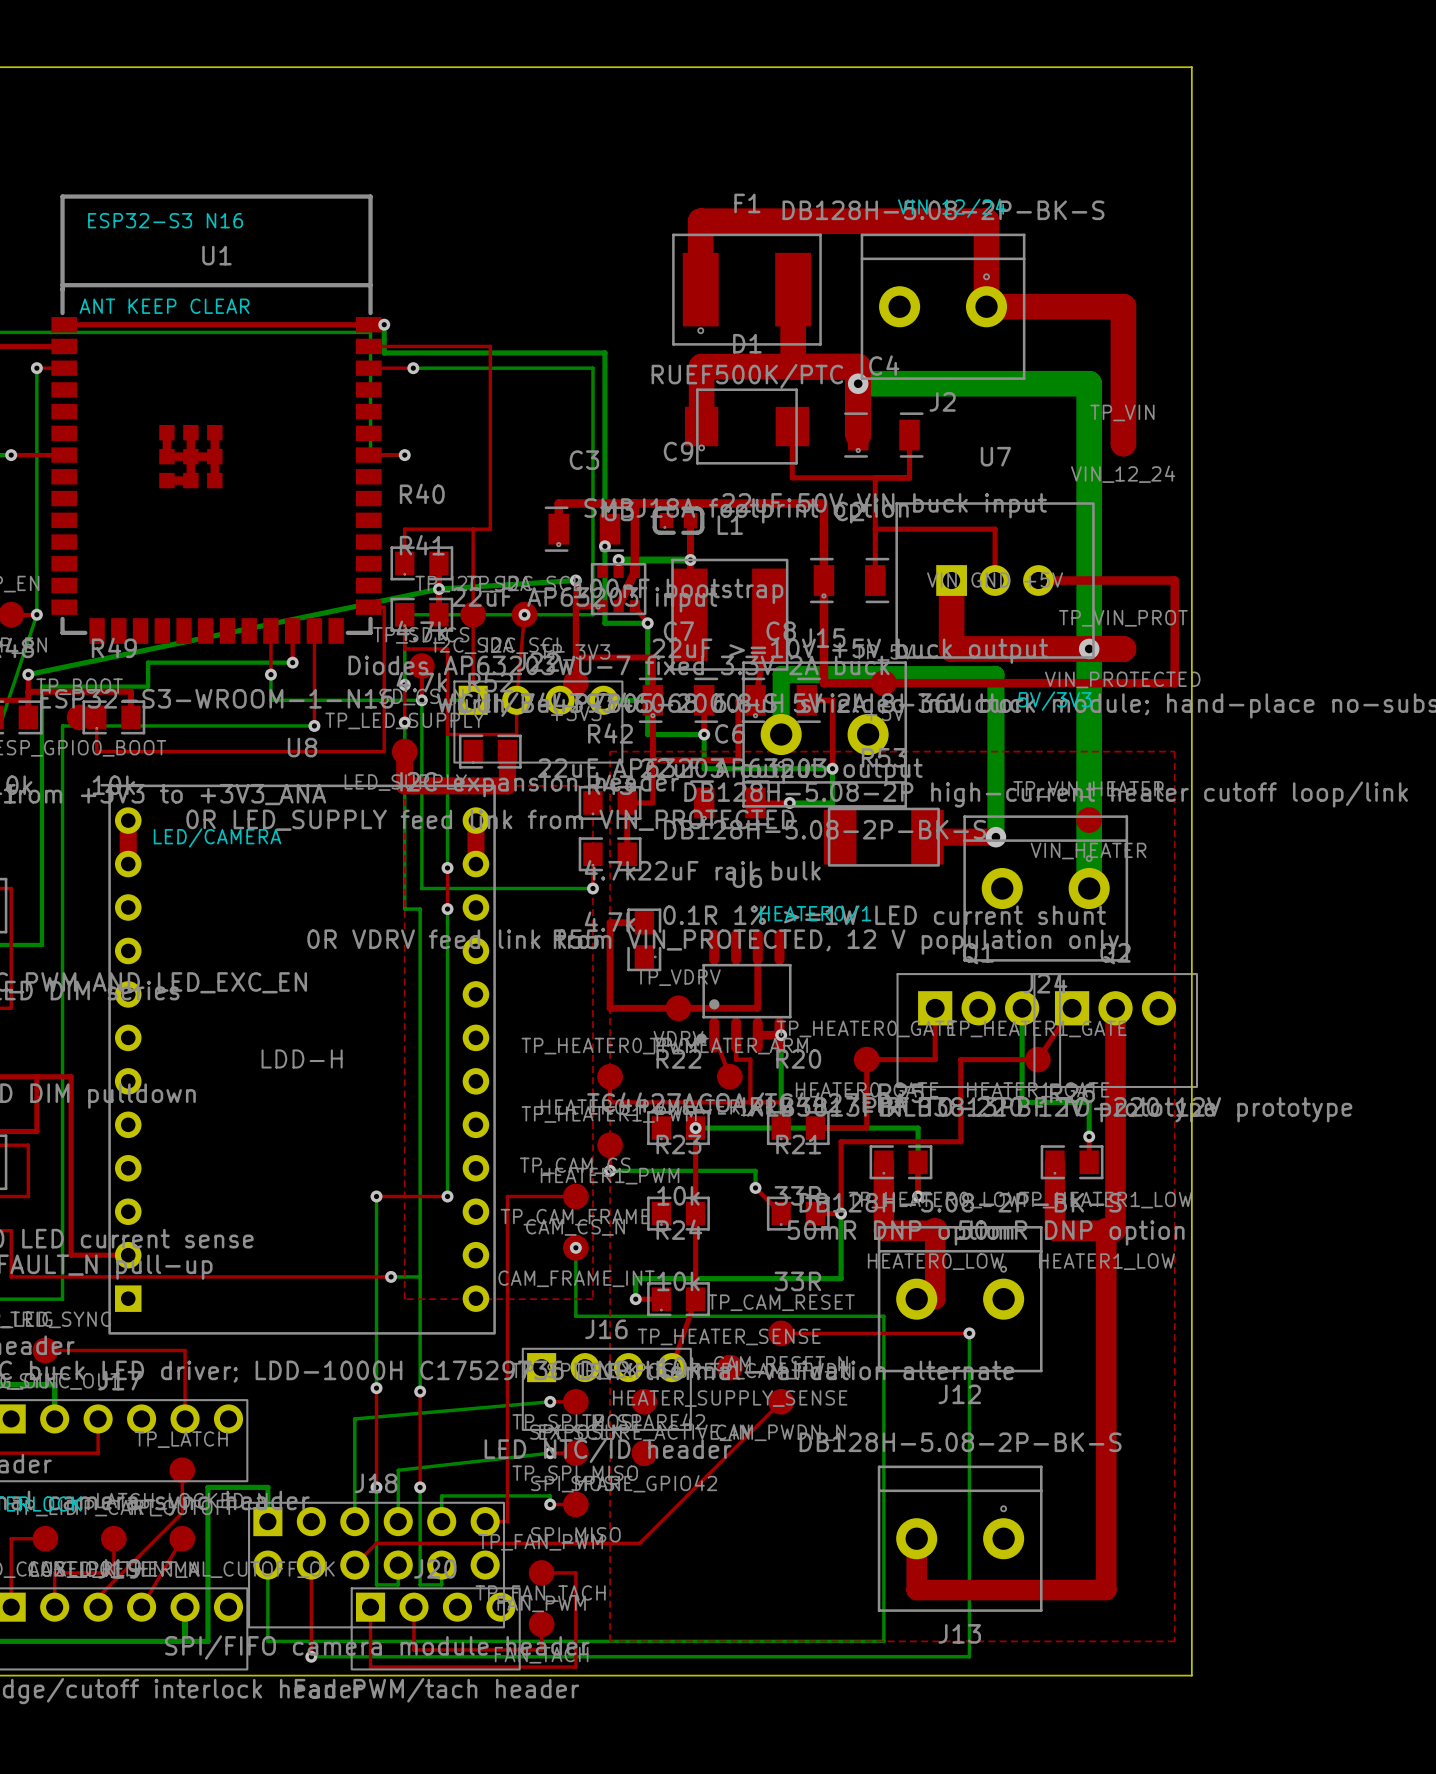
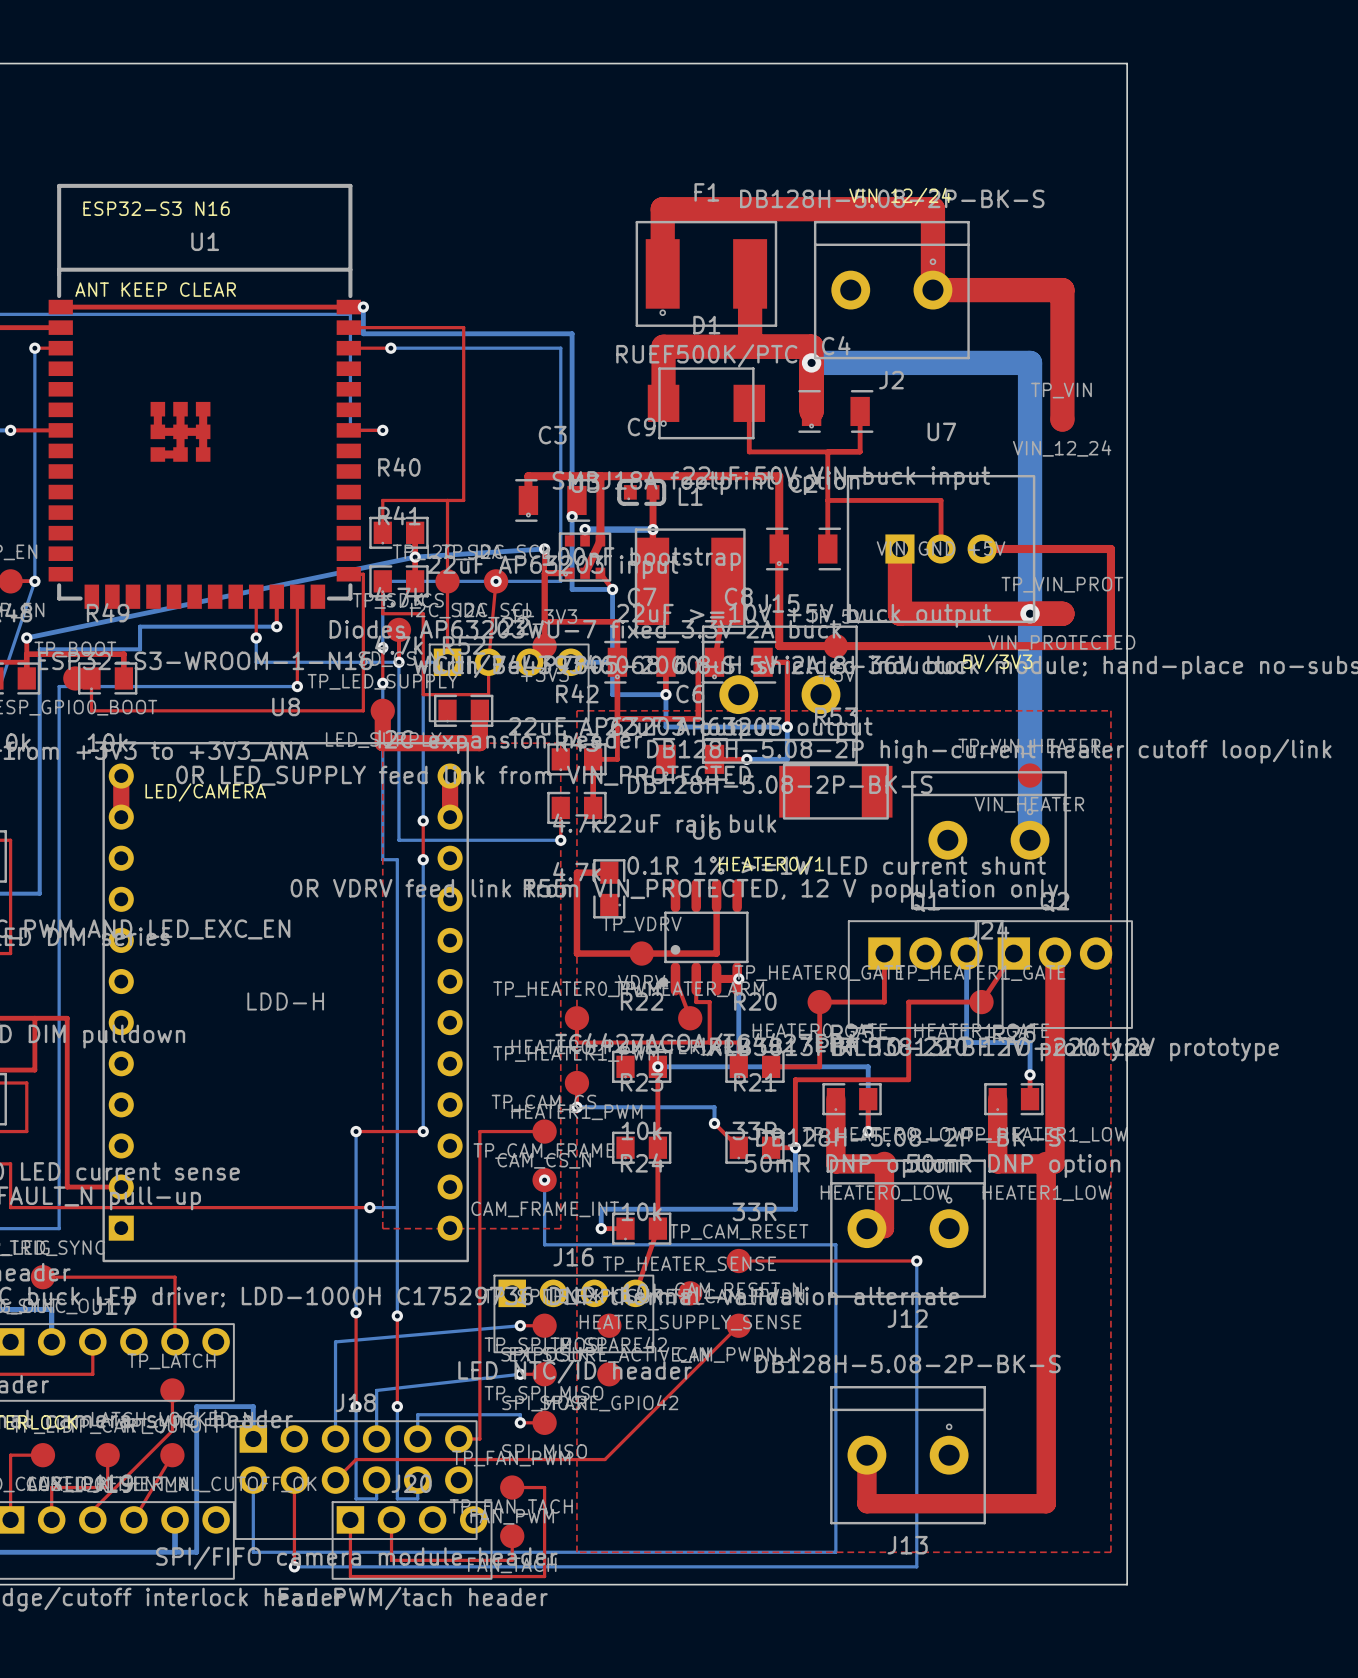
bottom track: (781, 734) (781, 674) (995, 674) (995, 837) -> none
top track: (927, 837) (995, 837) -> none
via: (995, 837) -> none

